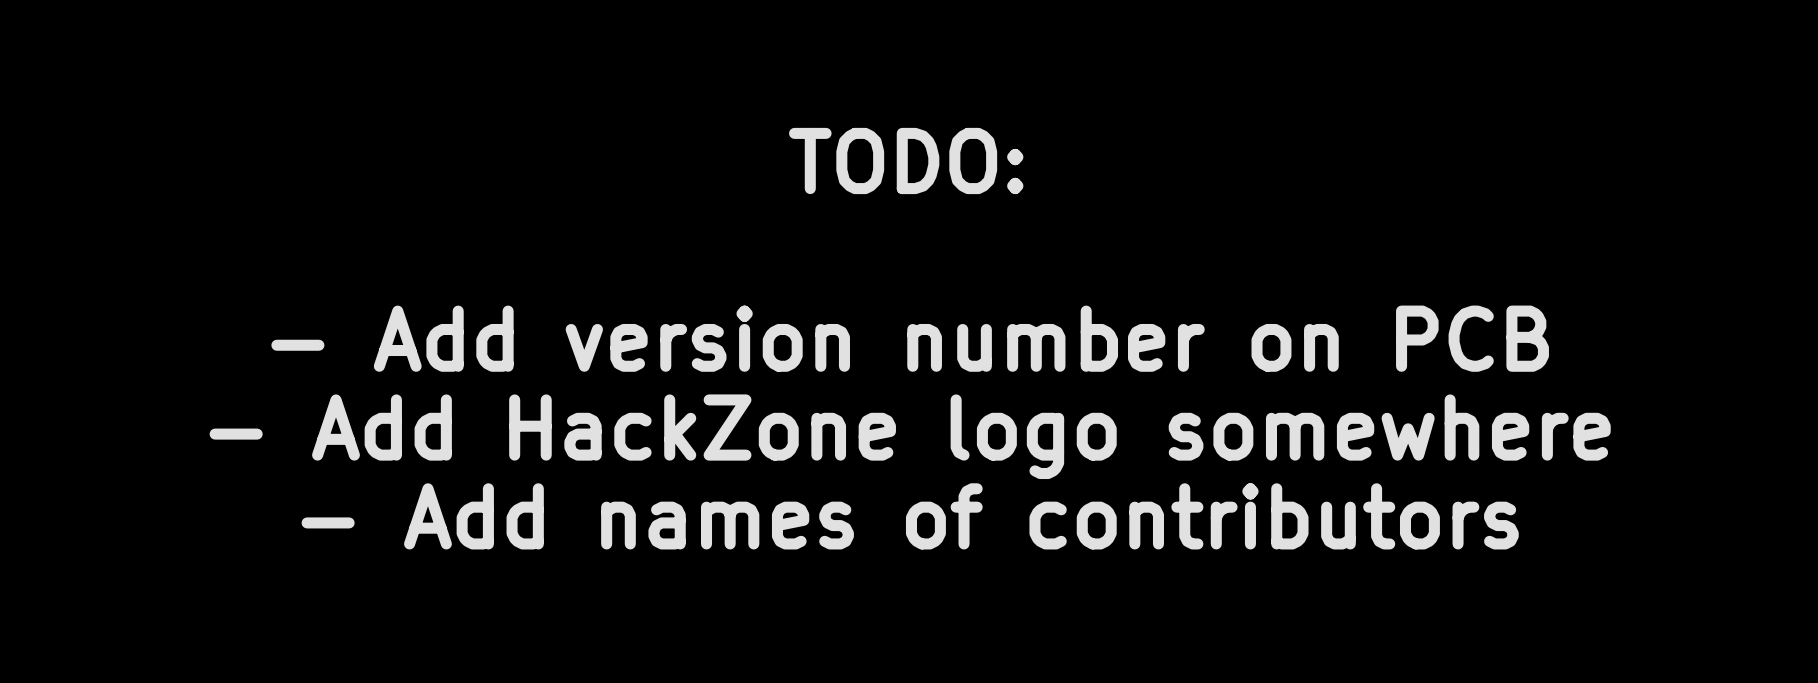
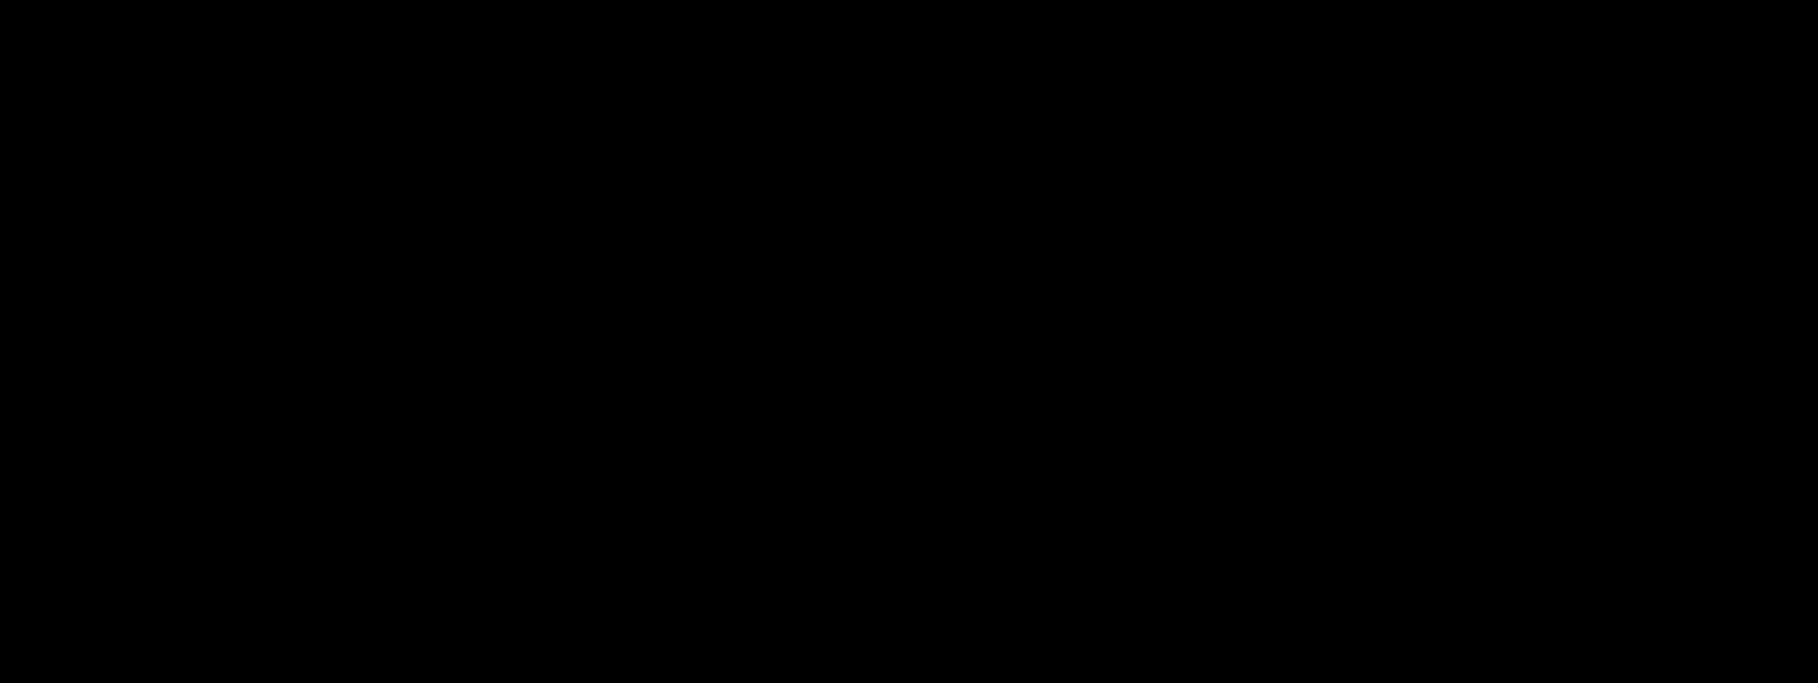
text: TODO: (906, 160) -> none
text: - Add version number on PCB (910, 338) -> none
text: - Add HackZone logo somewhere (910, 436) -> none
text: - Add names of contributors (910, 516) -> none

